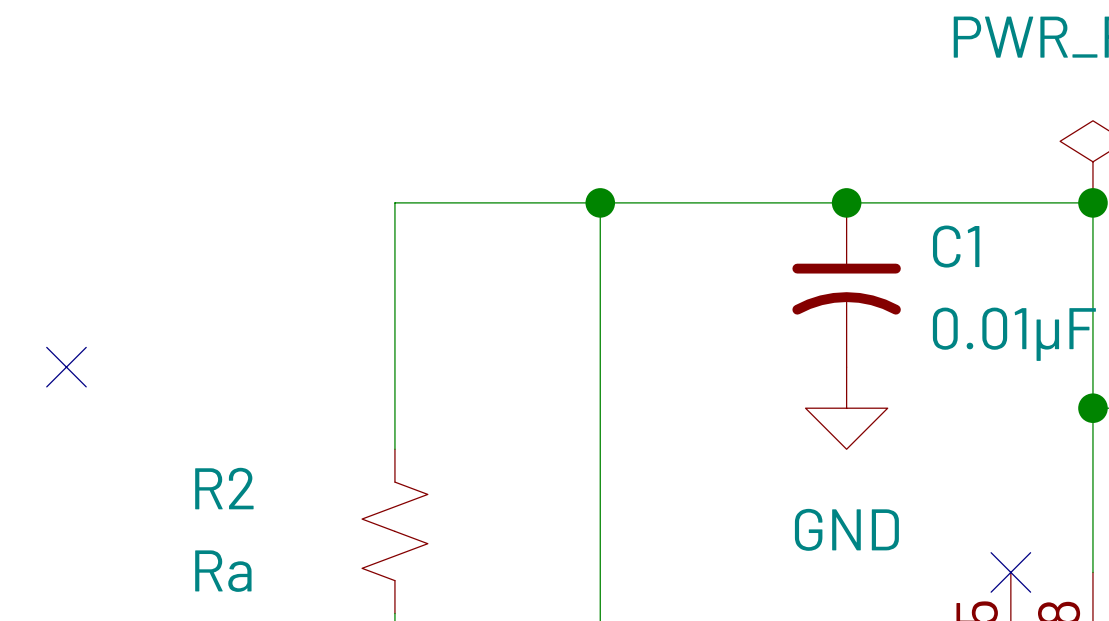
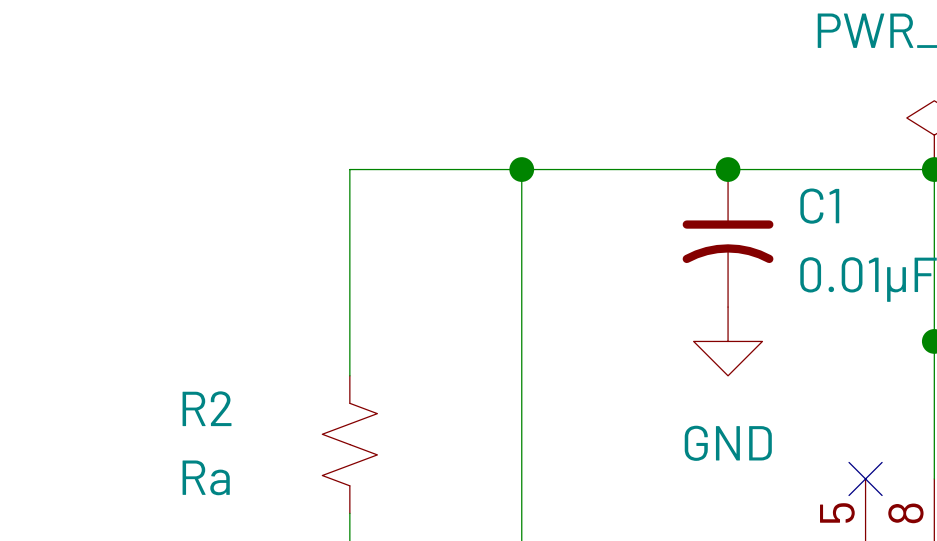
no-connect mark: (66, 367) -> none

